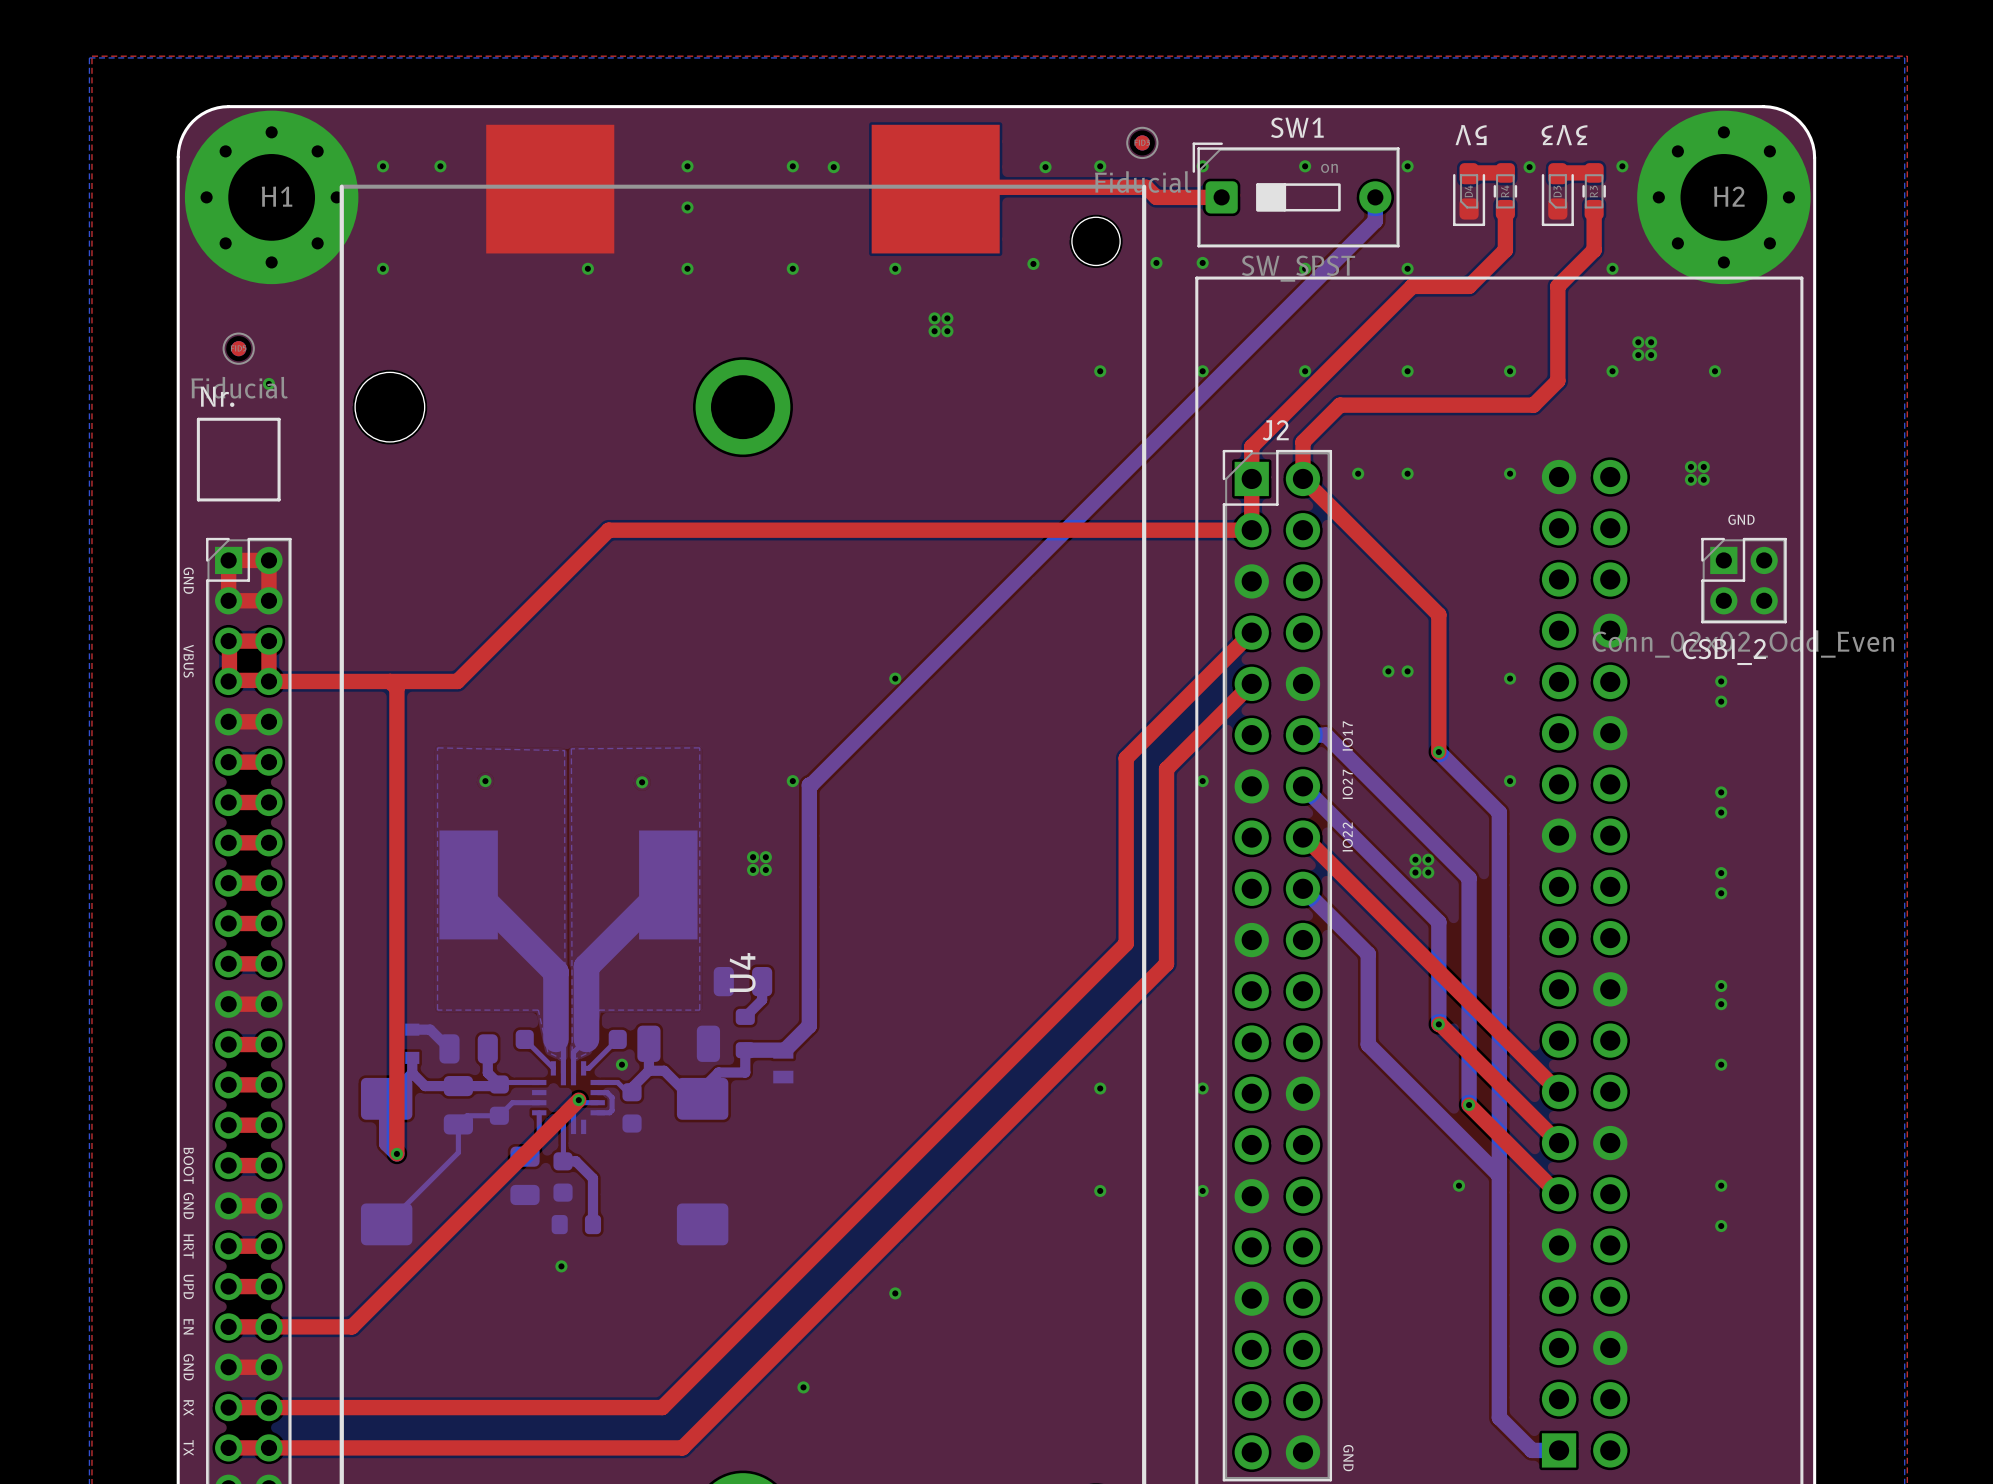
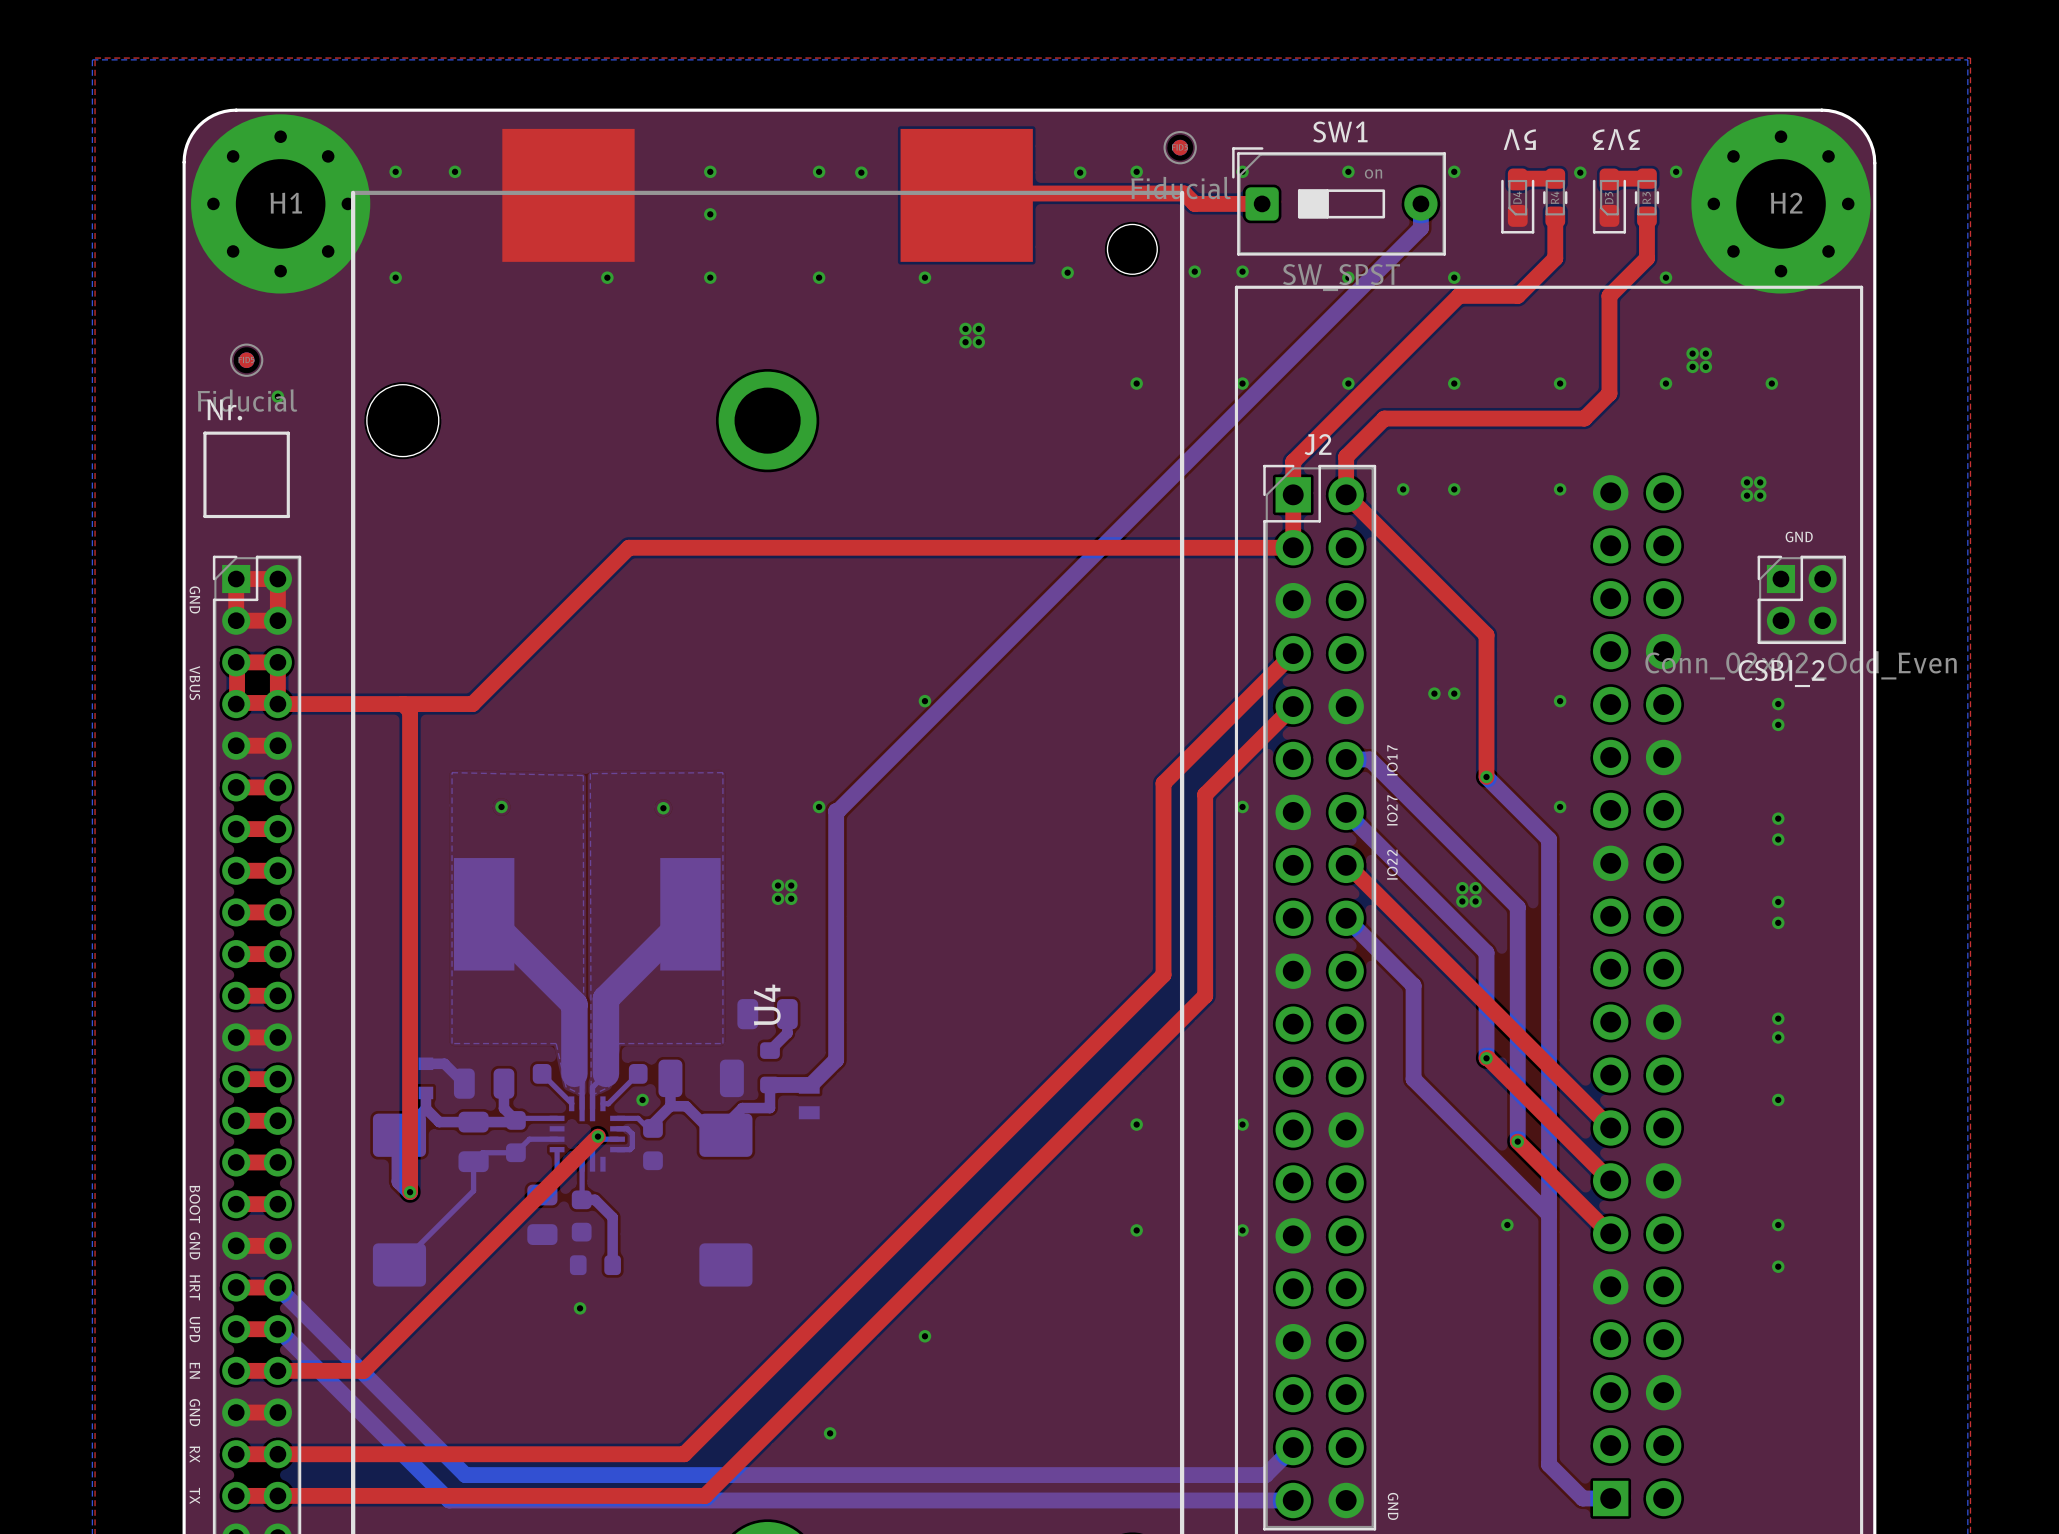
bottom track: none -> (277, 1287) (465, 1475) (1265, 1475) (1293, 1447)
bottom track: none -> (277, 1329) (449, 1500) (1293, 1500)

